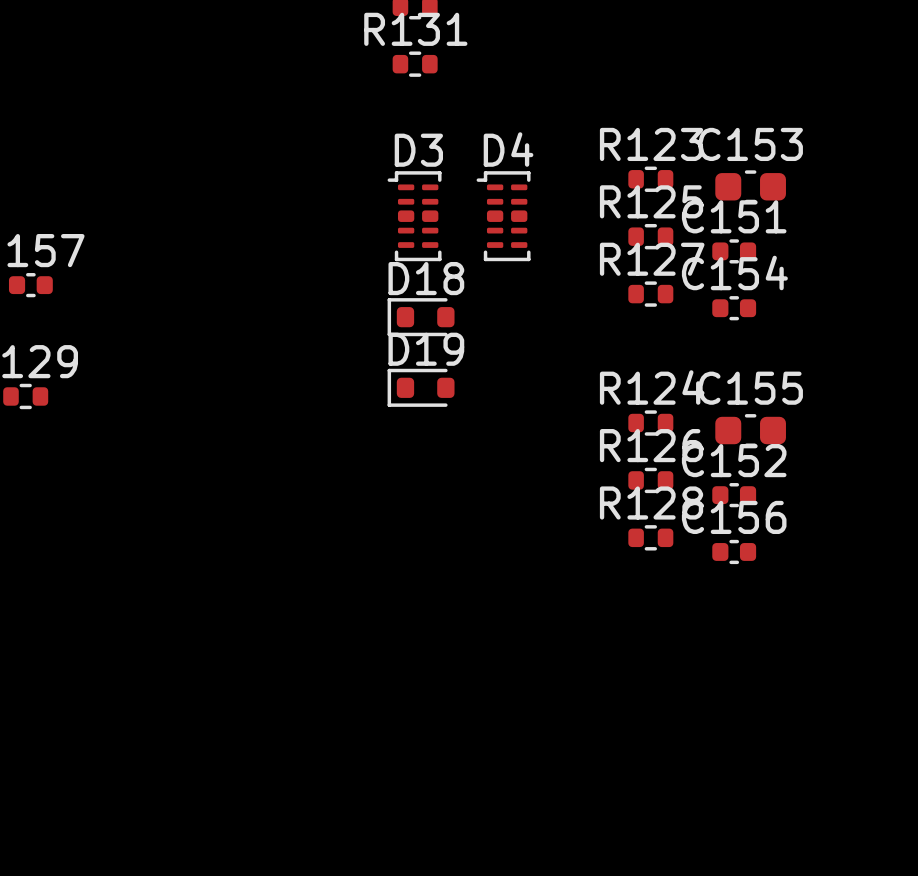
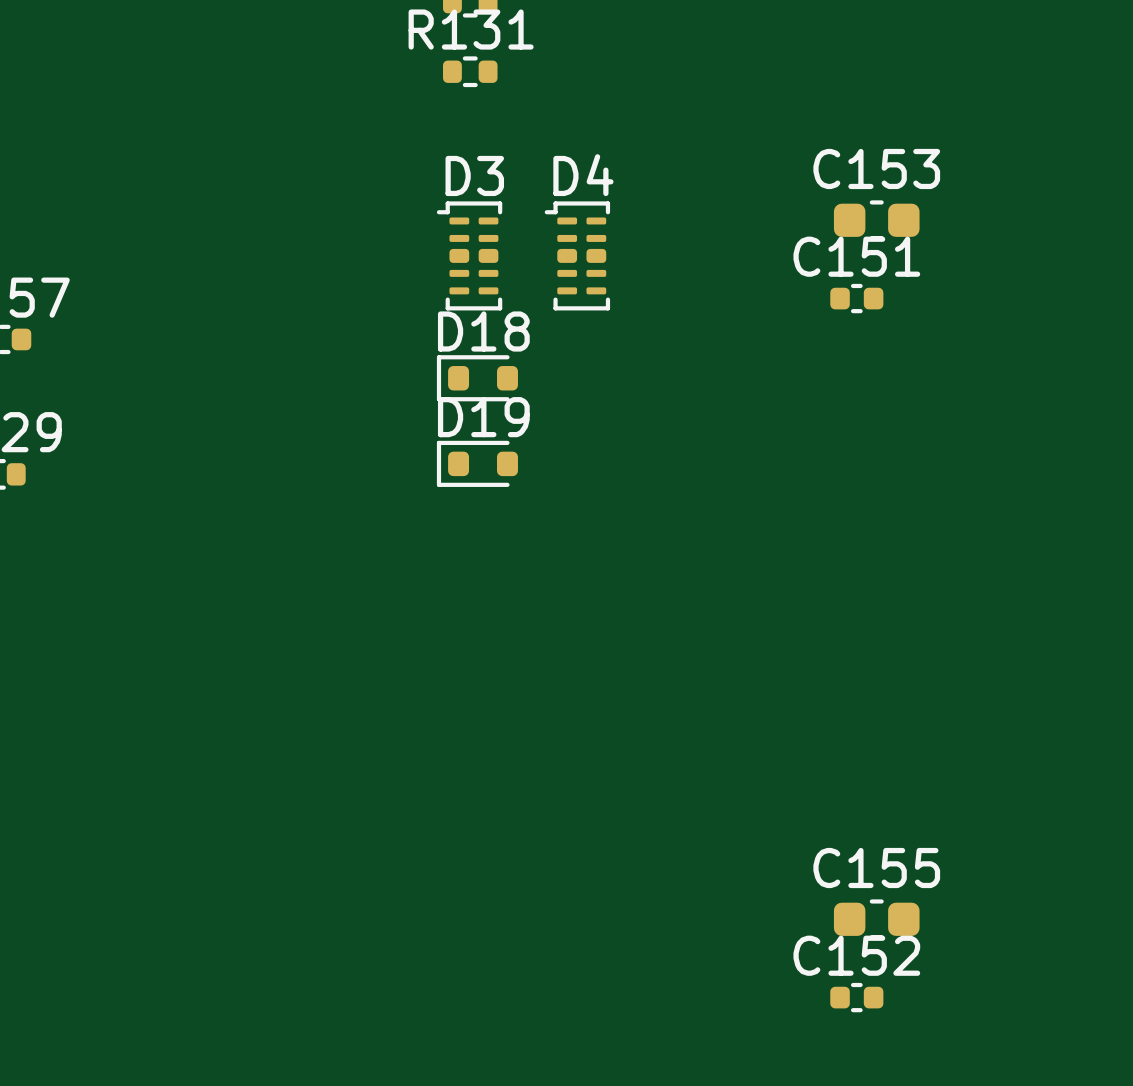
R123: (650, 179) -> none
R125: (650, 236) -> none
R127: (650, 294) -> none
C154: (734, 308) -> none
R124: (650, 423) -> none
C155 position: (750, 430) -> (876, 919)
R126: (650, 480) -> none
C152 position: (734, 495) -> (856, 997)
R128: (650, 537) -> none
C156: (734, 551) -> none

